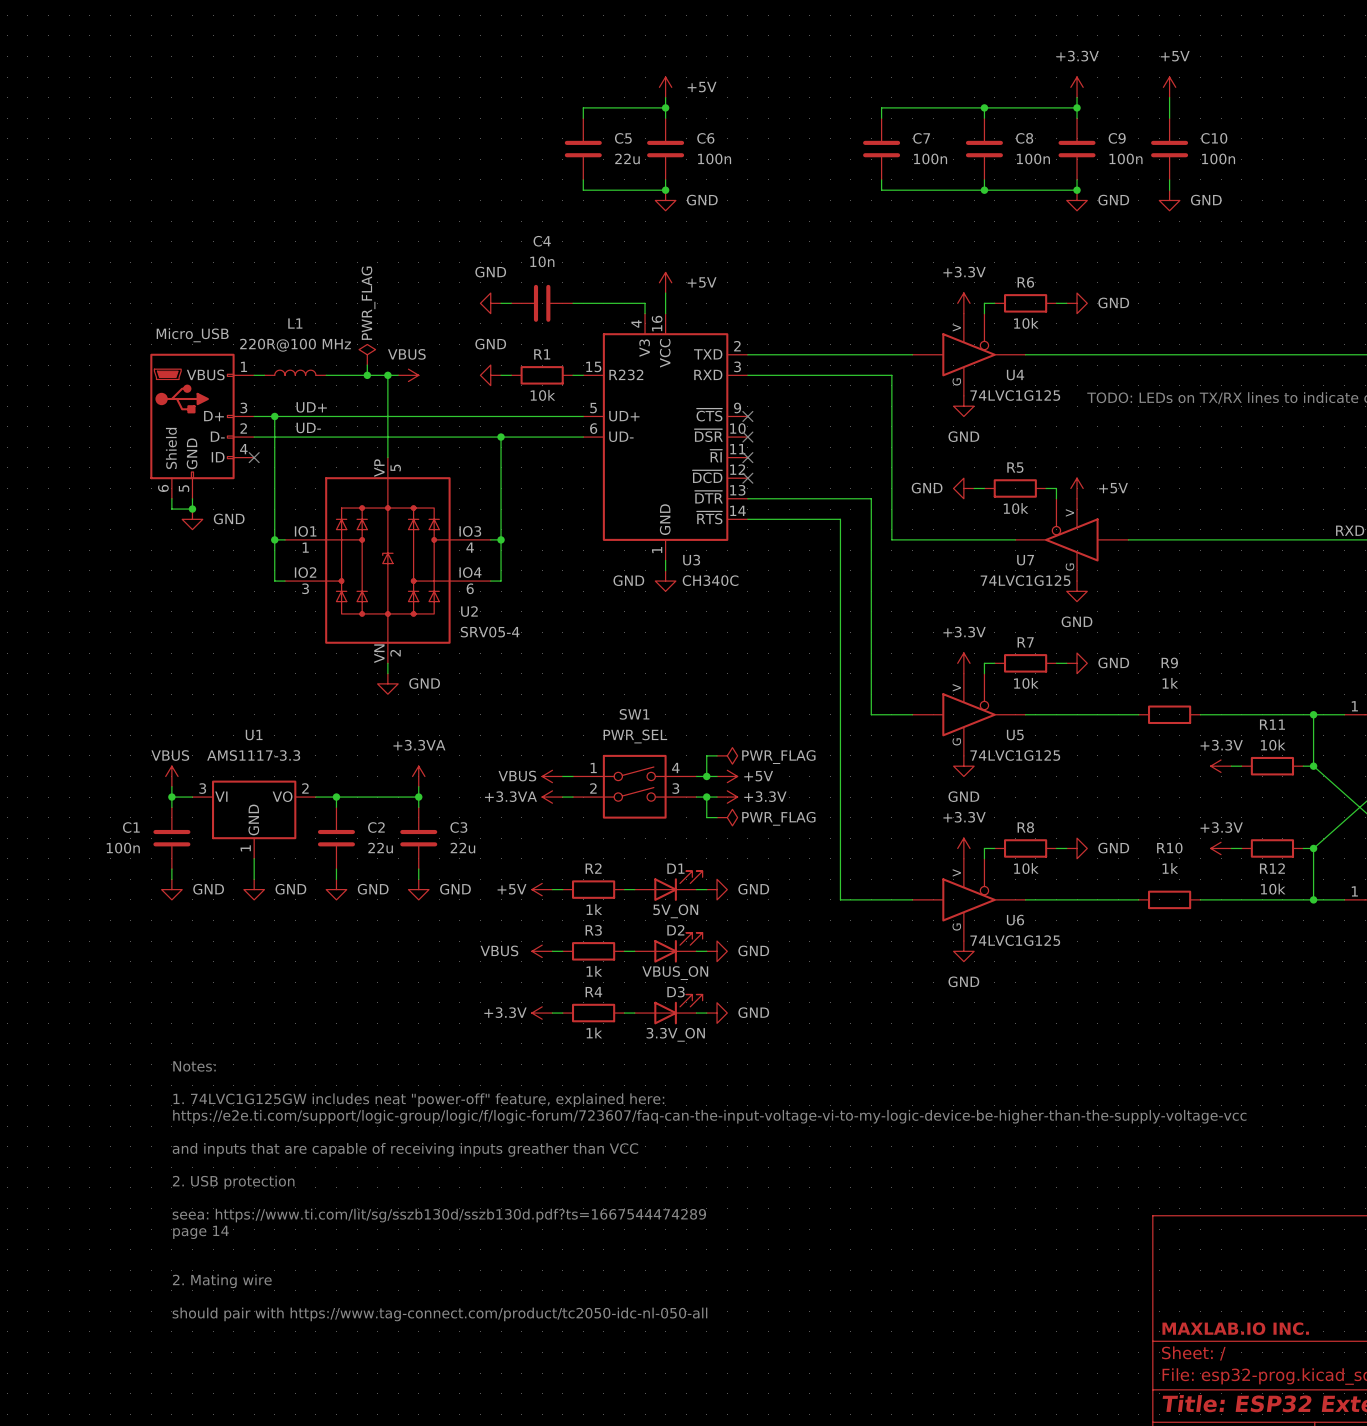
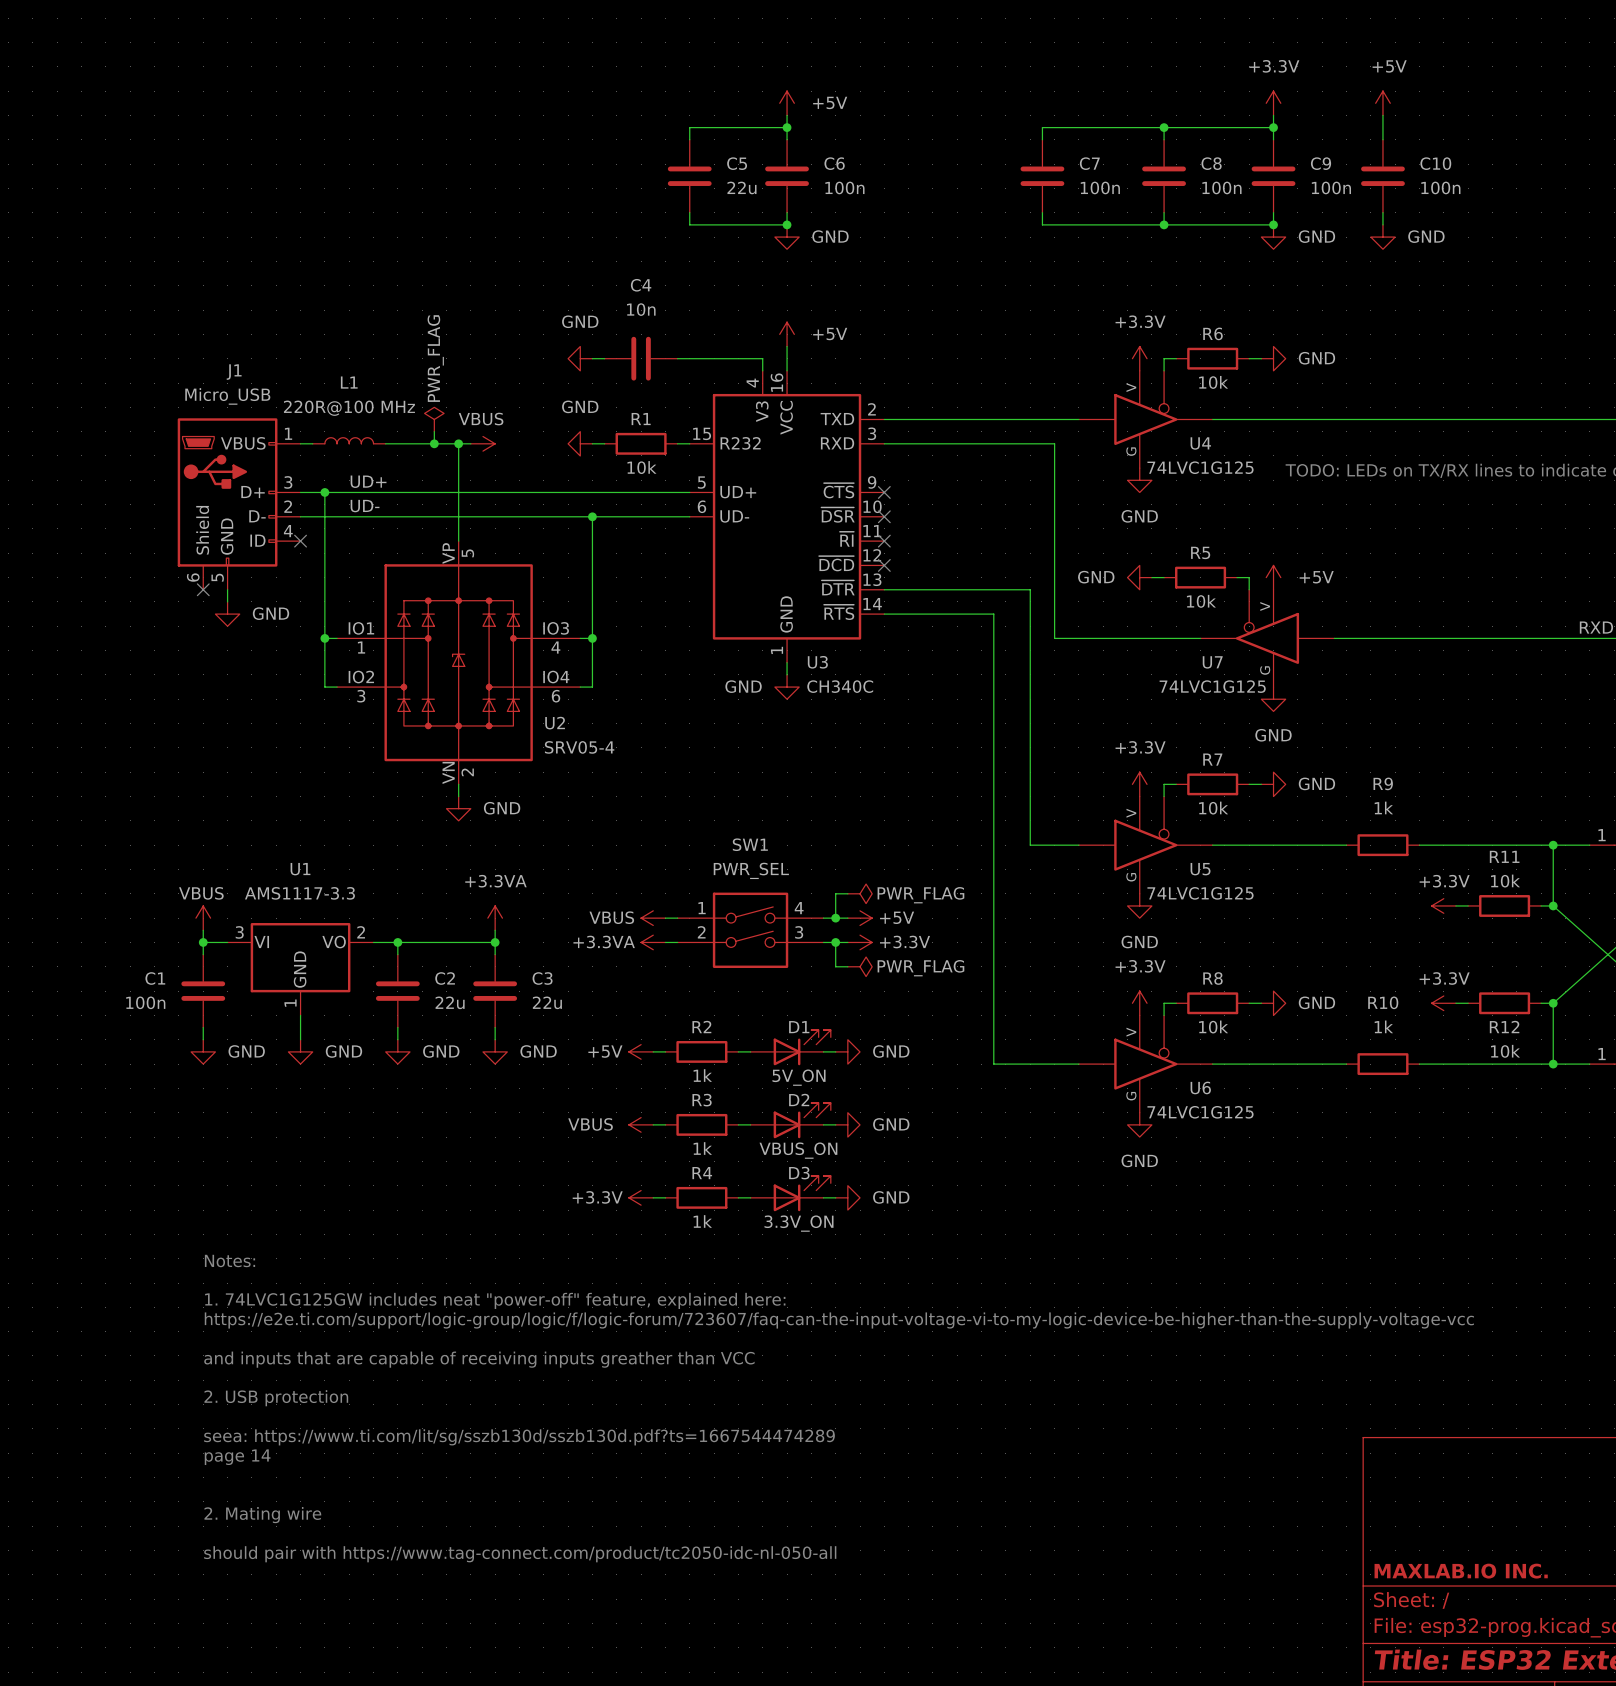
J1 name: none -> J1 (234, 372)
wire: (171, 498) (171, 509) (192, 509) -> none
no-connect mark: none -> (203, 589)
junction: (192, 509) -> none

